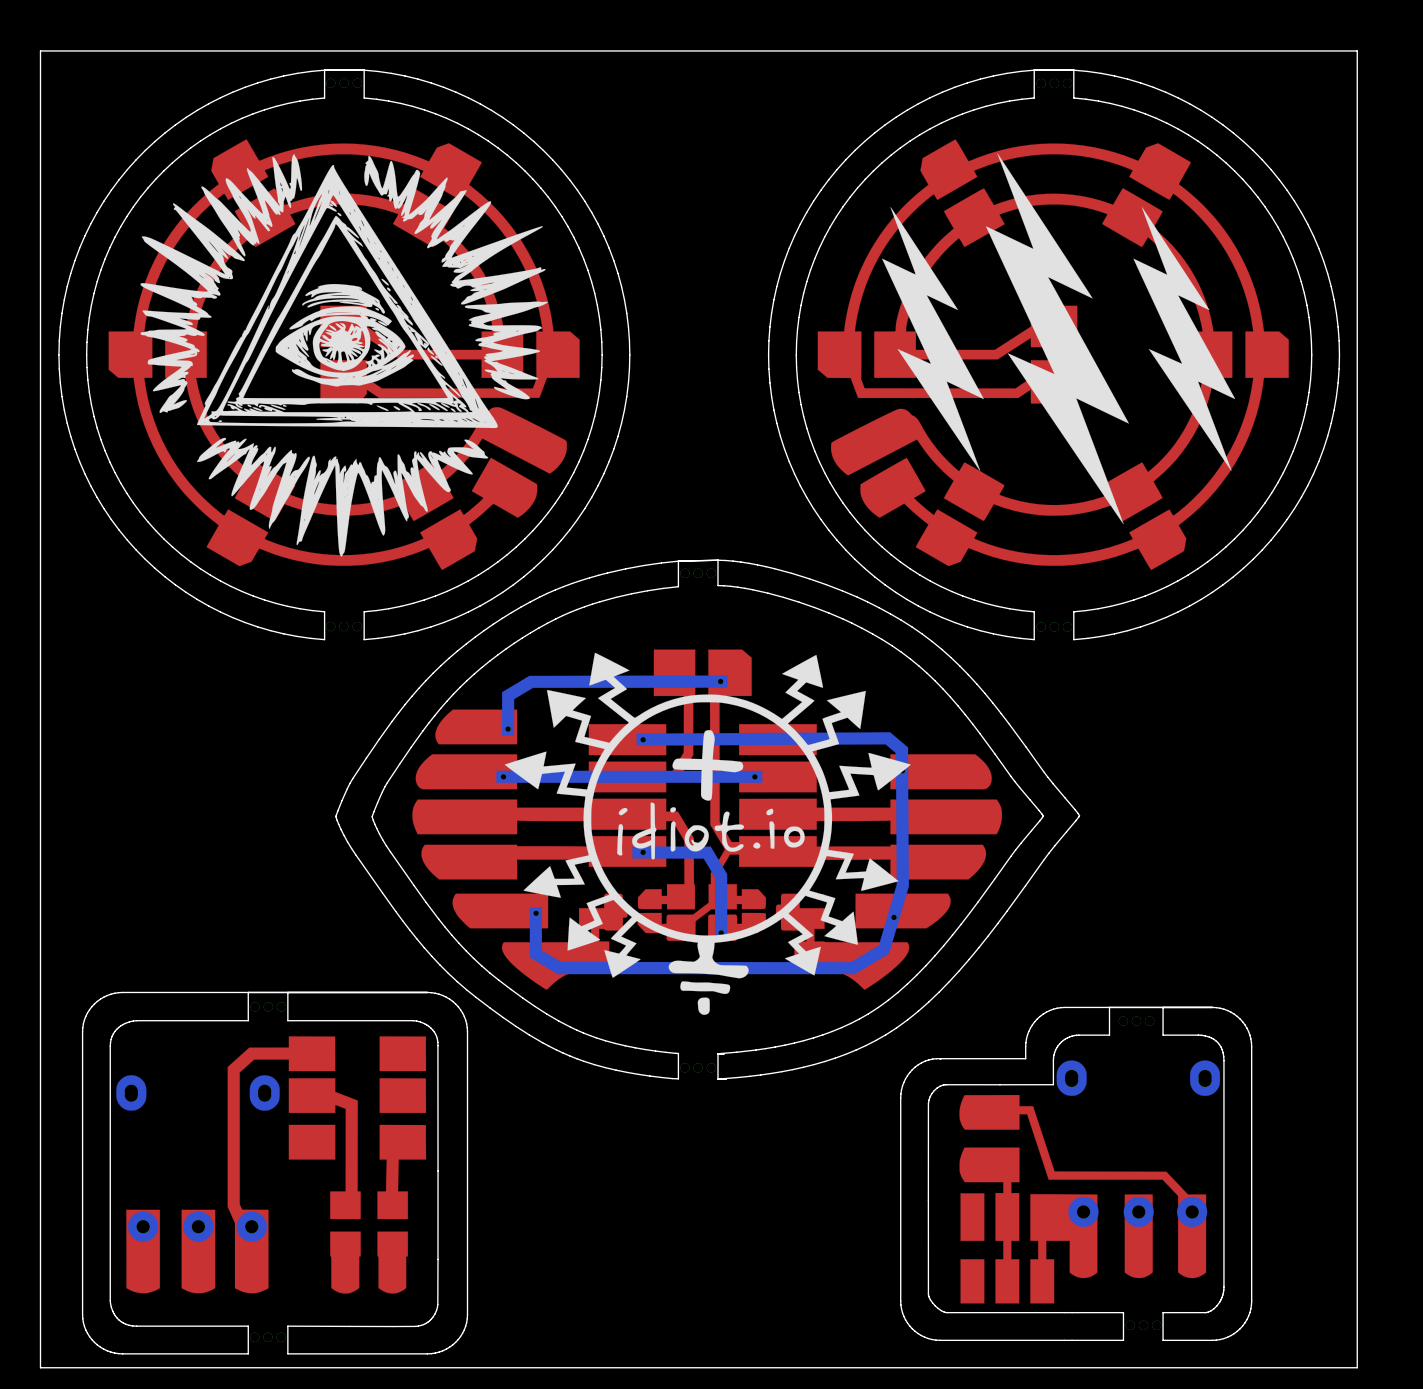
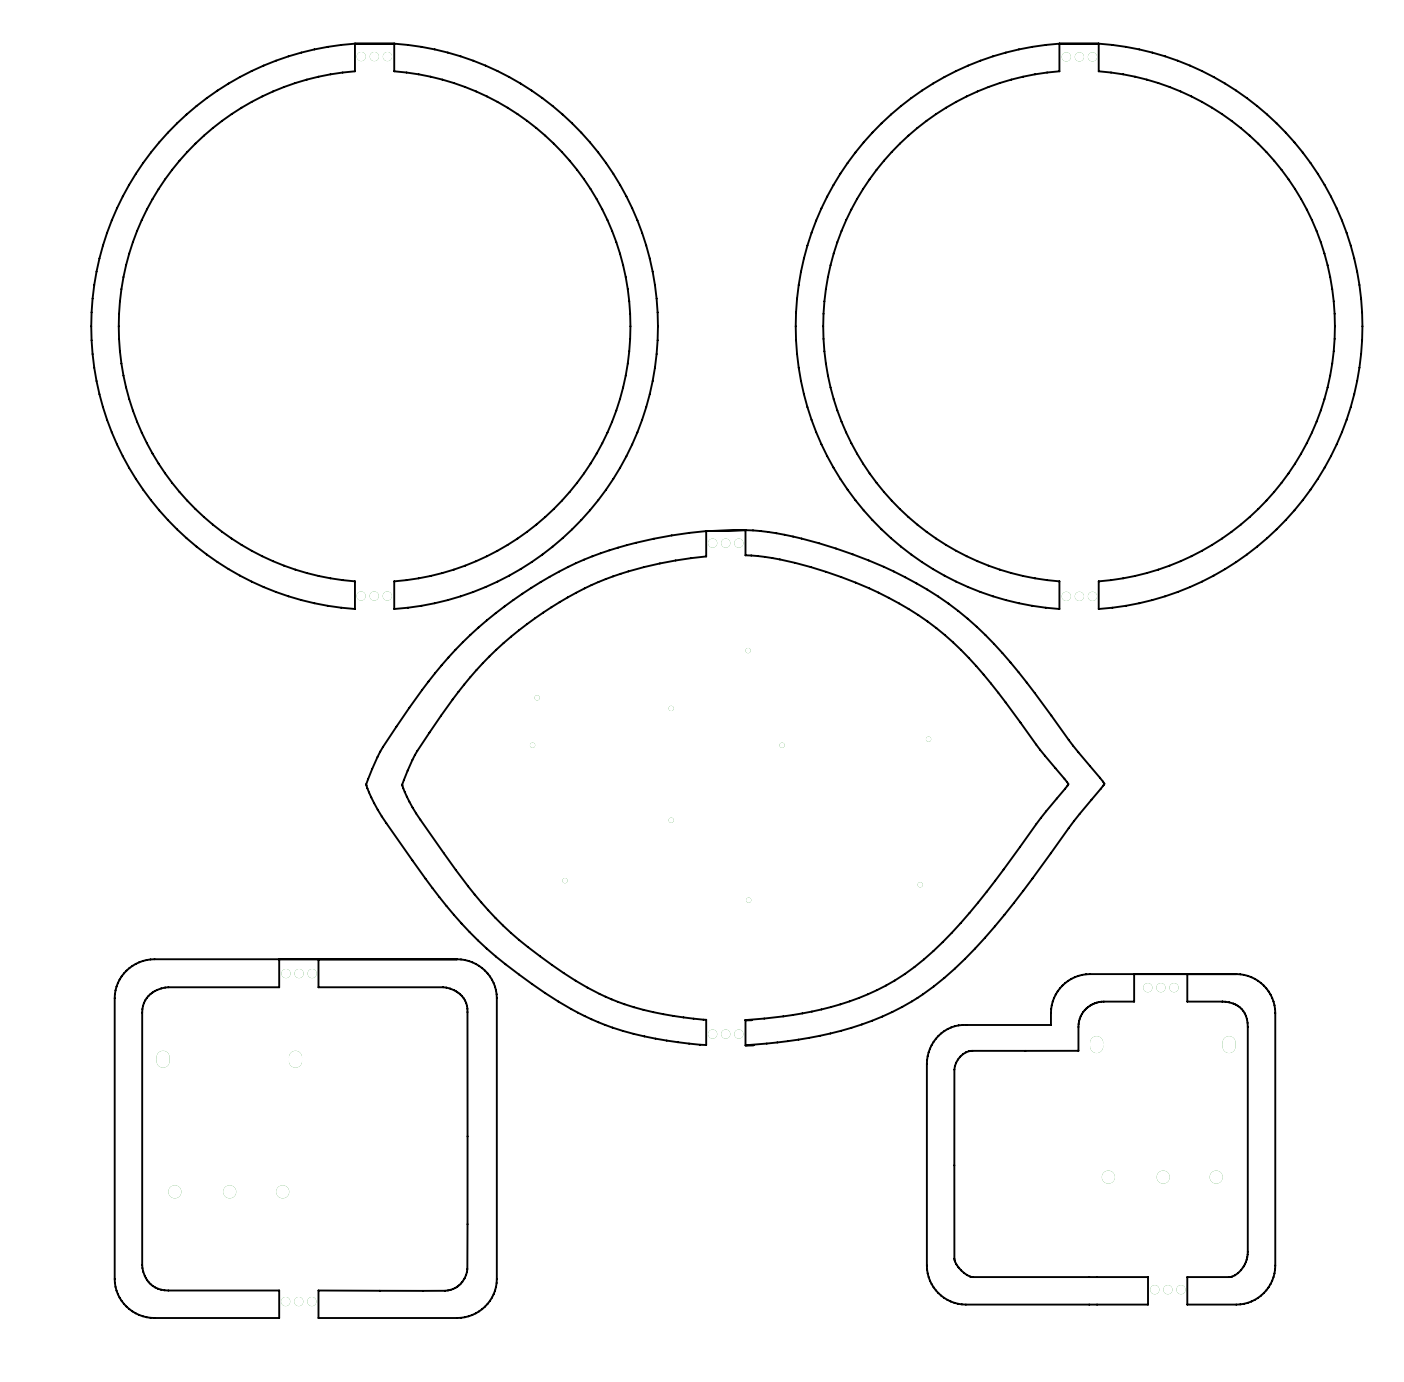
board edge: (1357, 50) (40, 50) (40, 1367) (1357, 1367) (1357, 50) -> none
drawing: [108, 139, 1289, 1304] -> none

